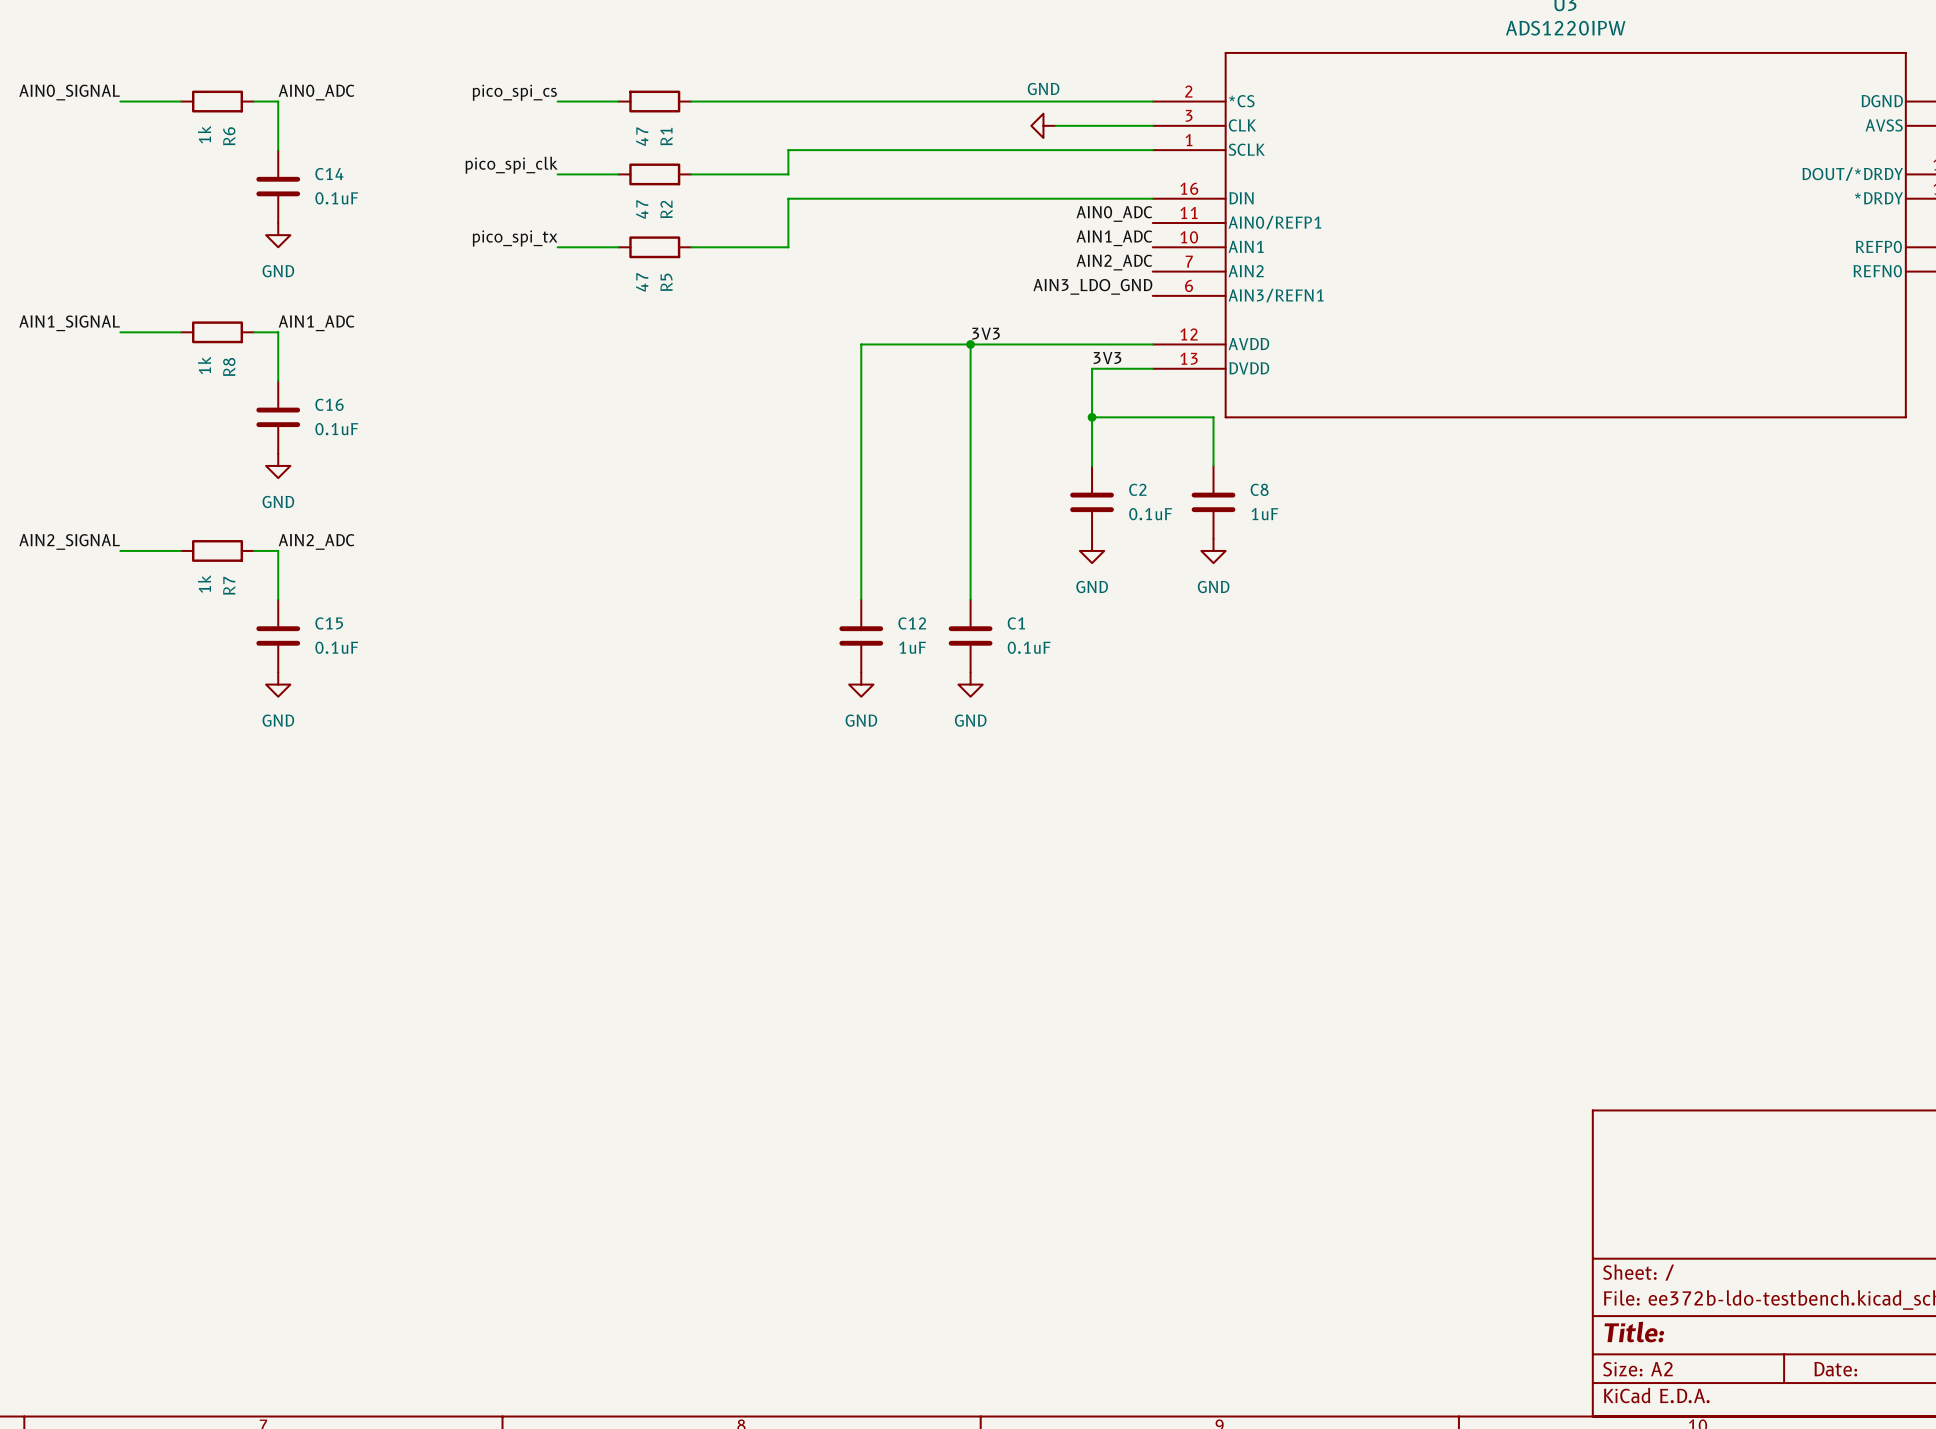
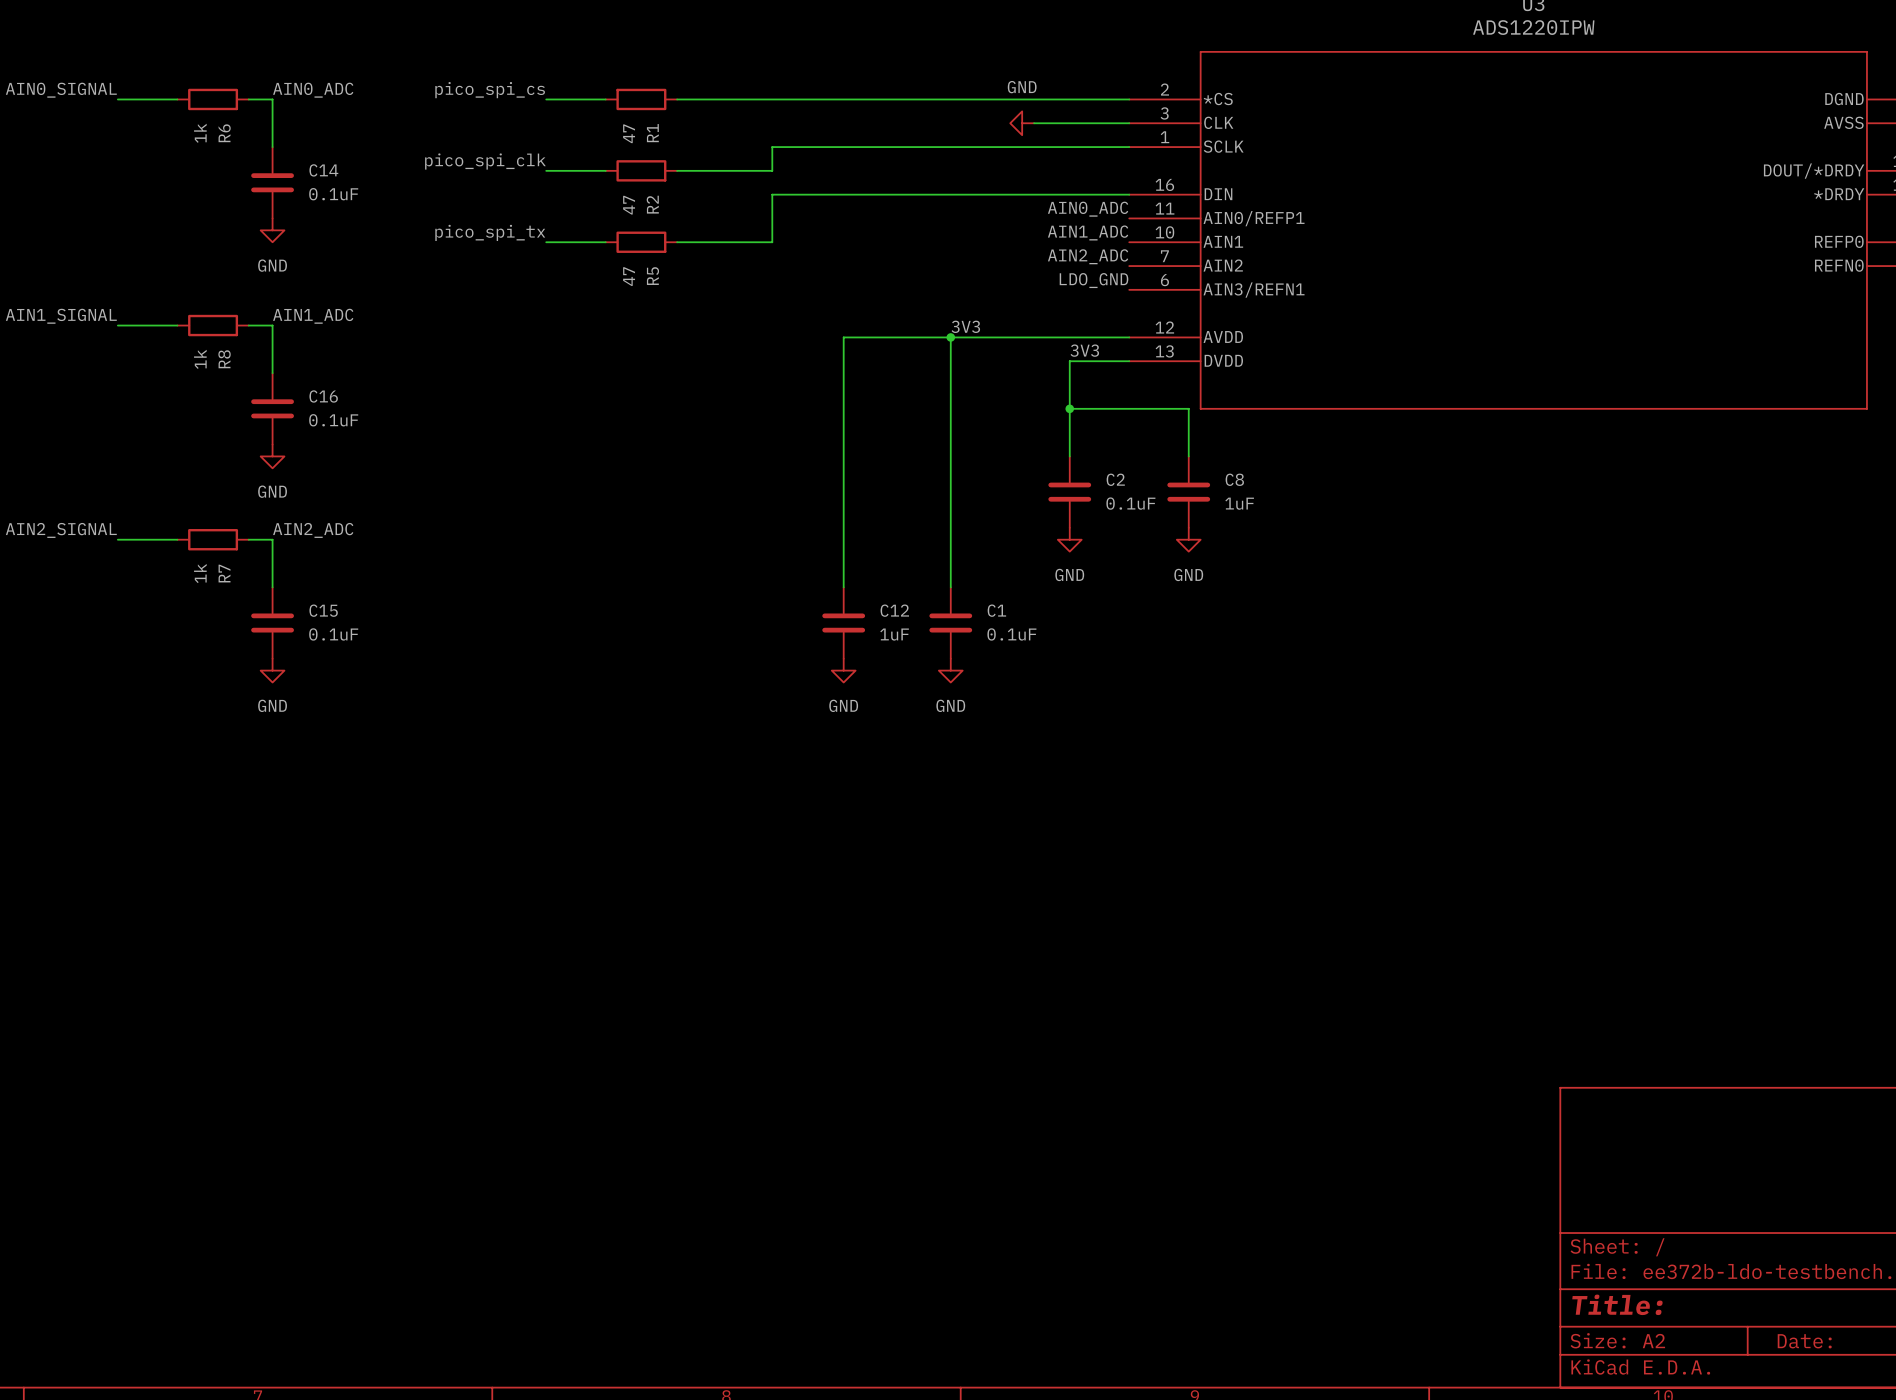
label: AIN3_LDO_GND (1092, 286) -> LDO_GND (1094, 280)

